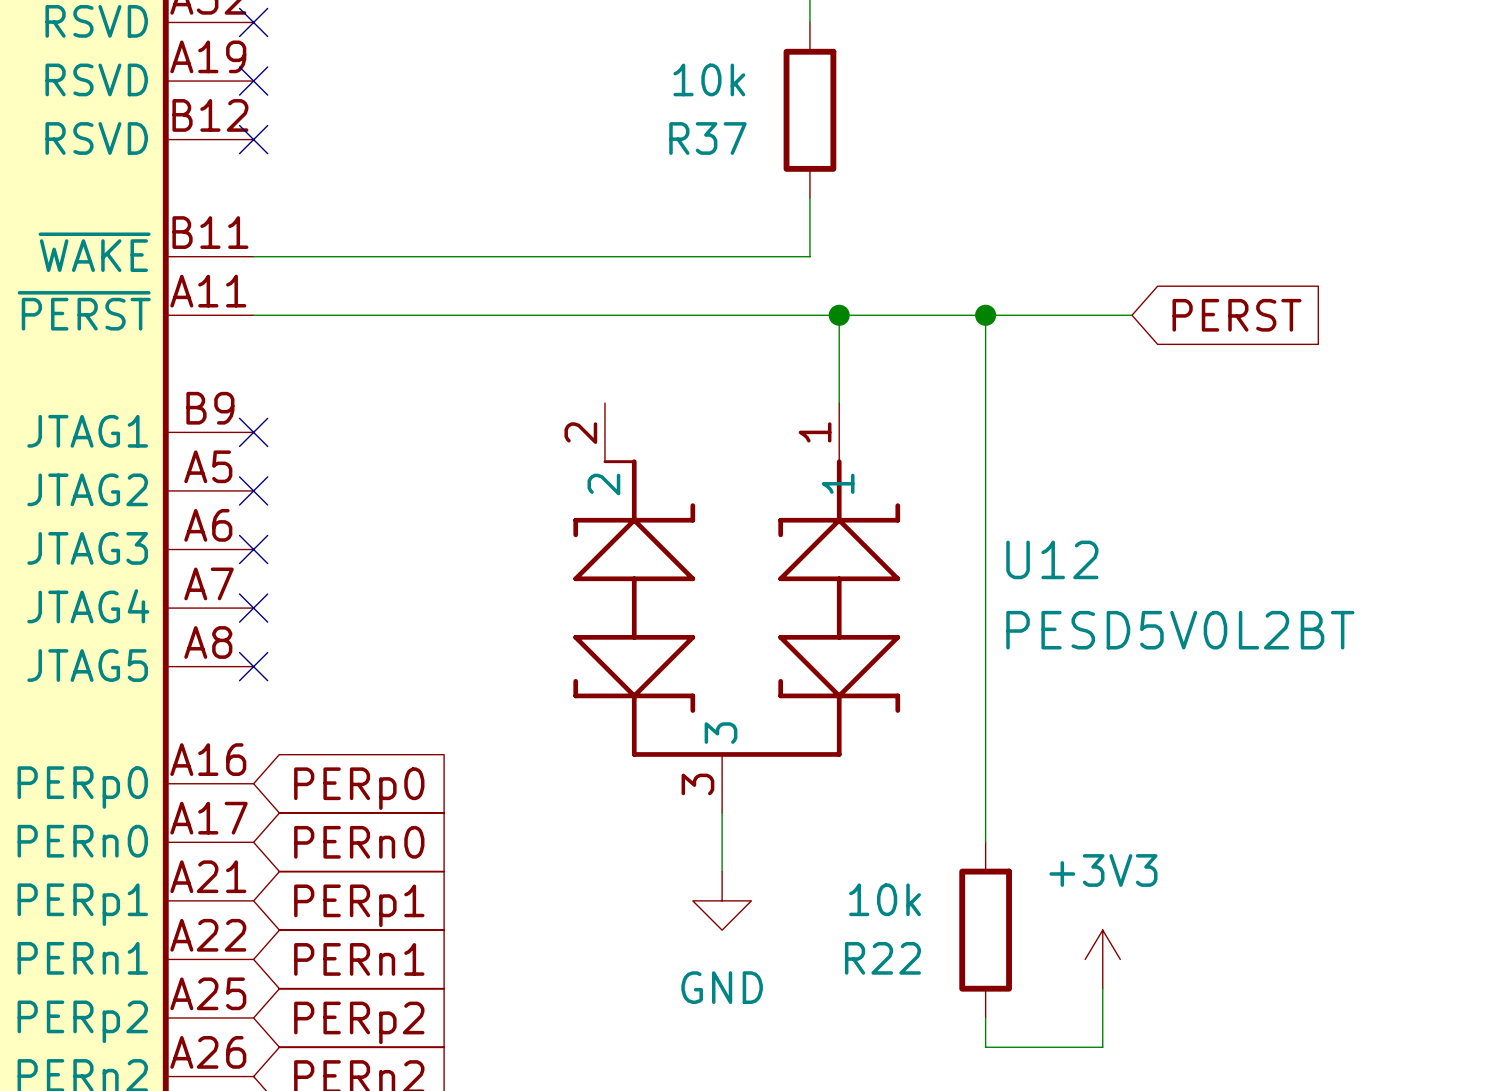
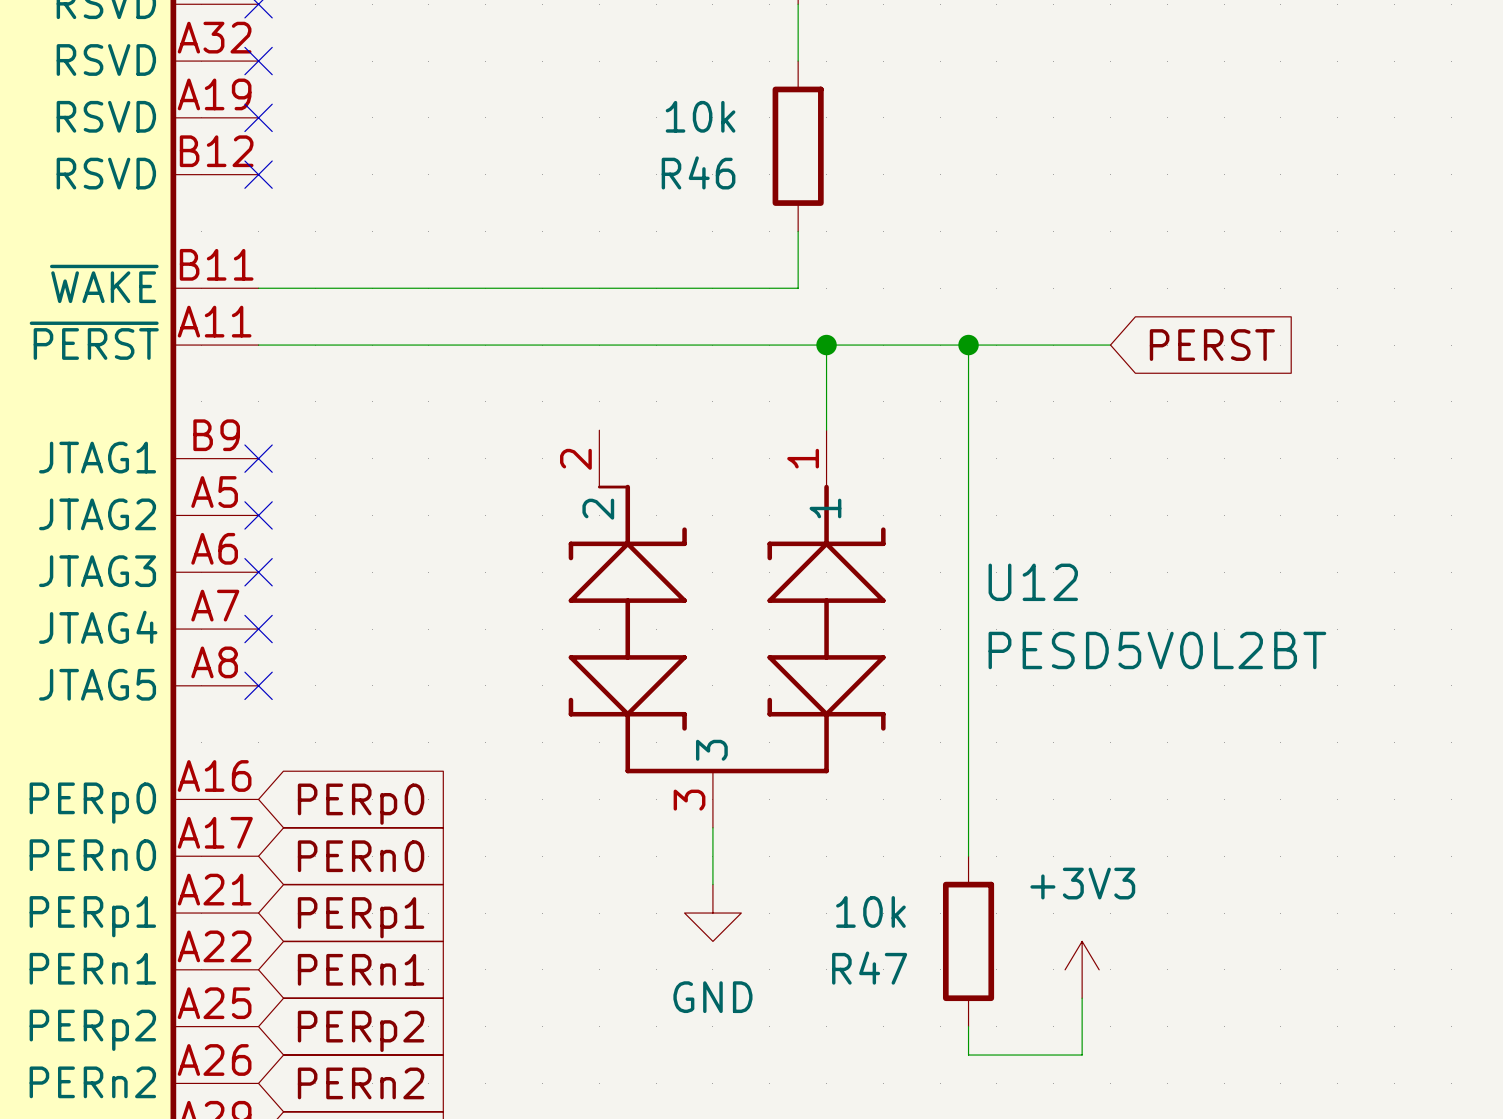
R37 name: R37 (707, 138) -> R46 (698, 172)
R22 name: R22 (882, 958) -> R47 (869, 968)

